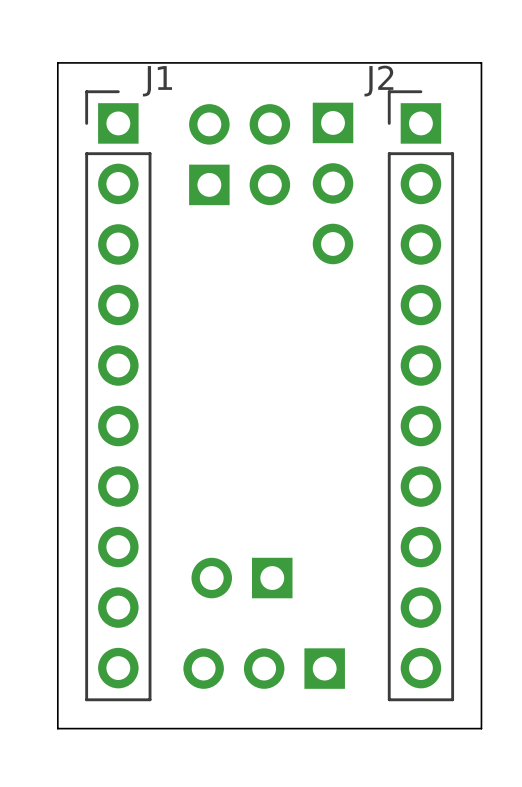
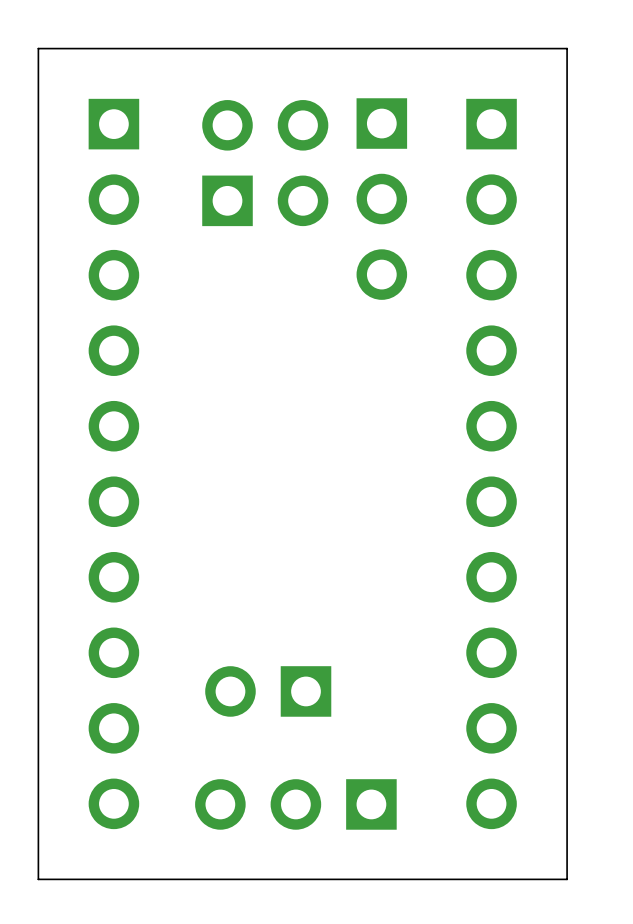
J1 side: bottom (118, 395) -> top (113, 463)
J2 side: bottom (420, 395) -> top (491, 463)

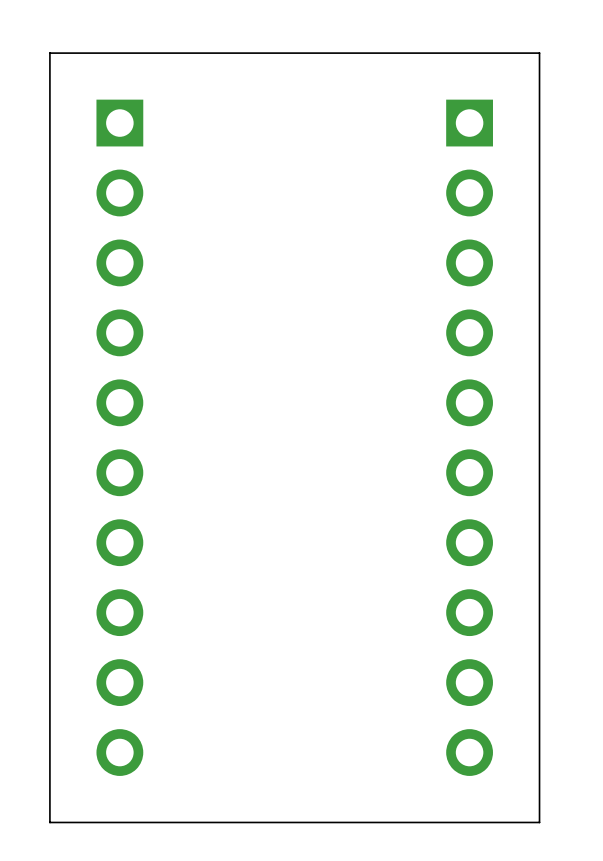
part: (265, 163) -> none
part: (381, 199) -> none
part: (268, 691) -> none
part: (295, 804) -> none

